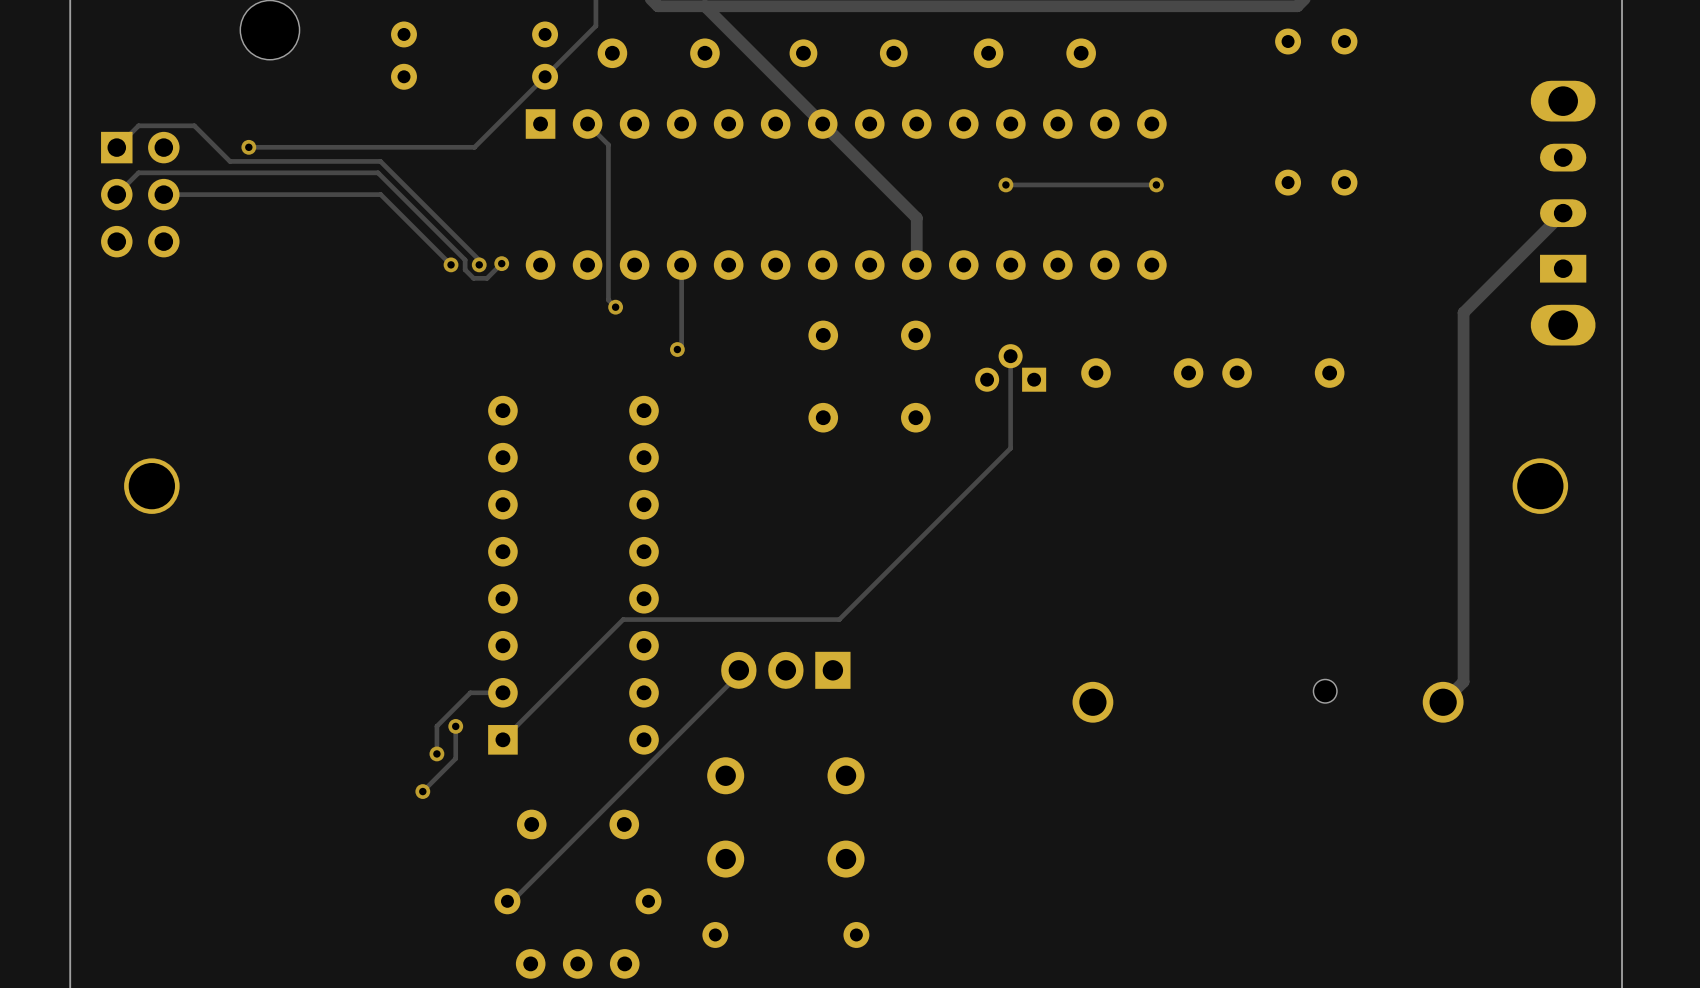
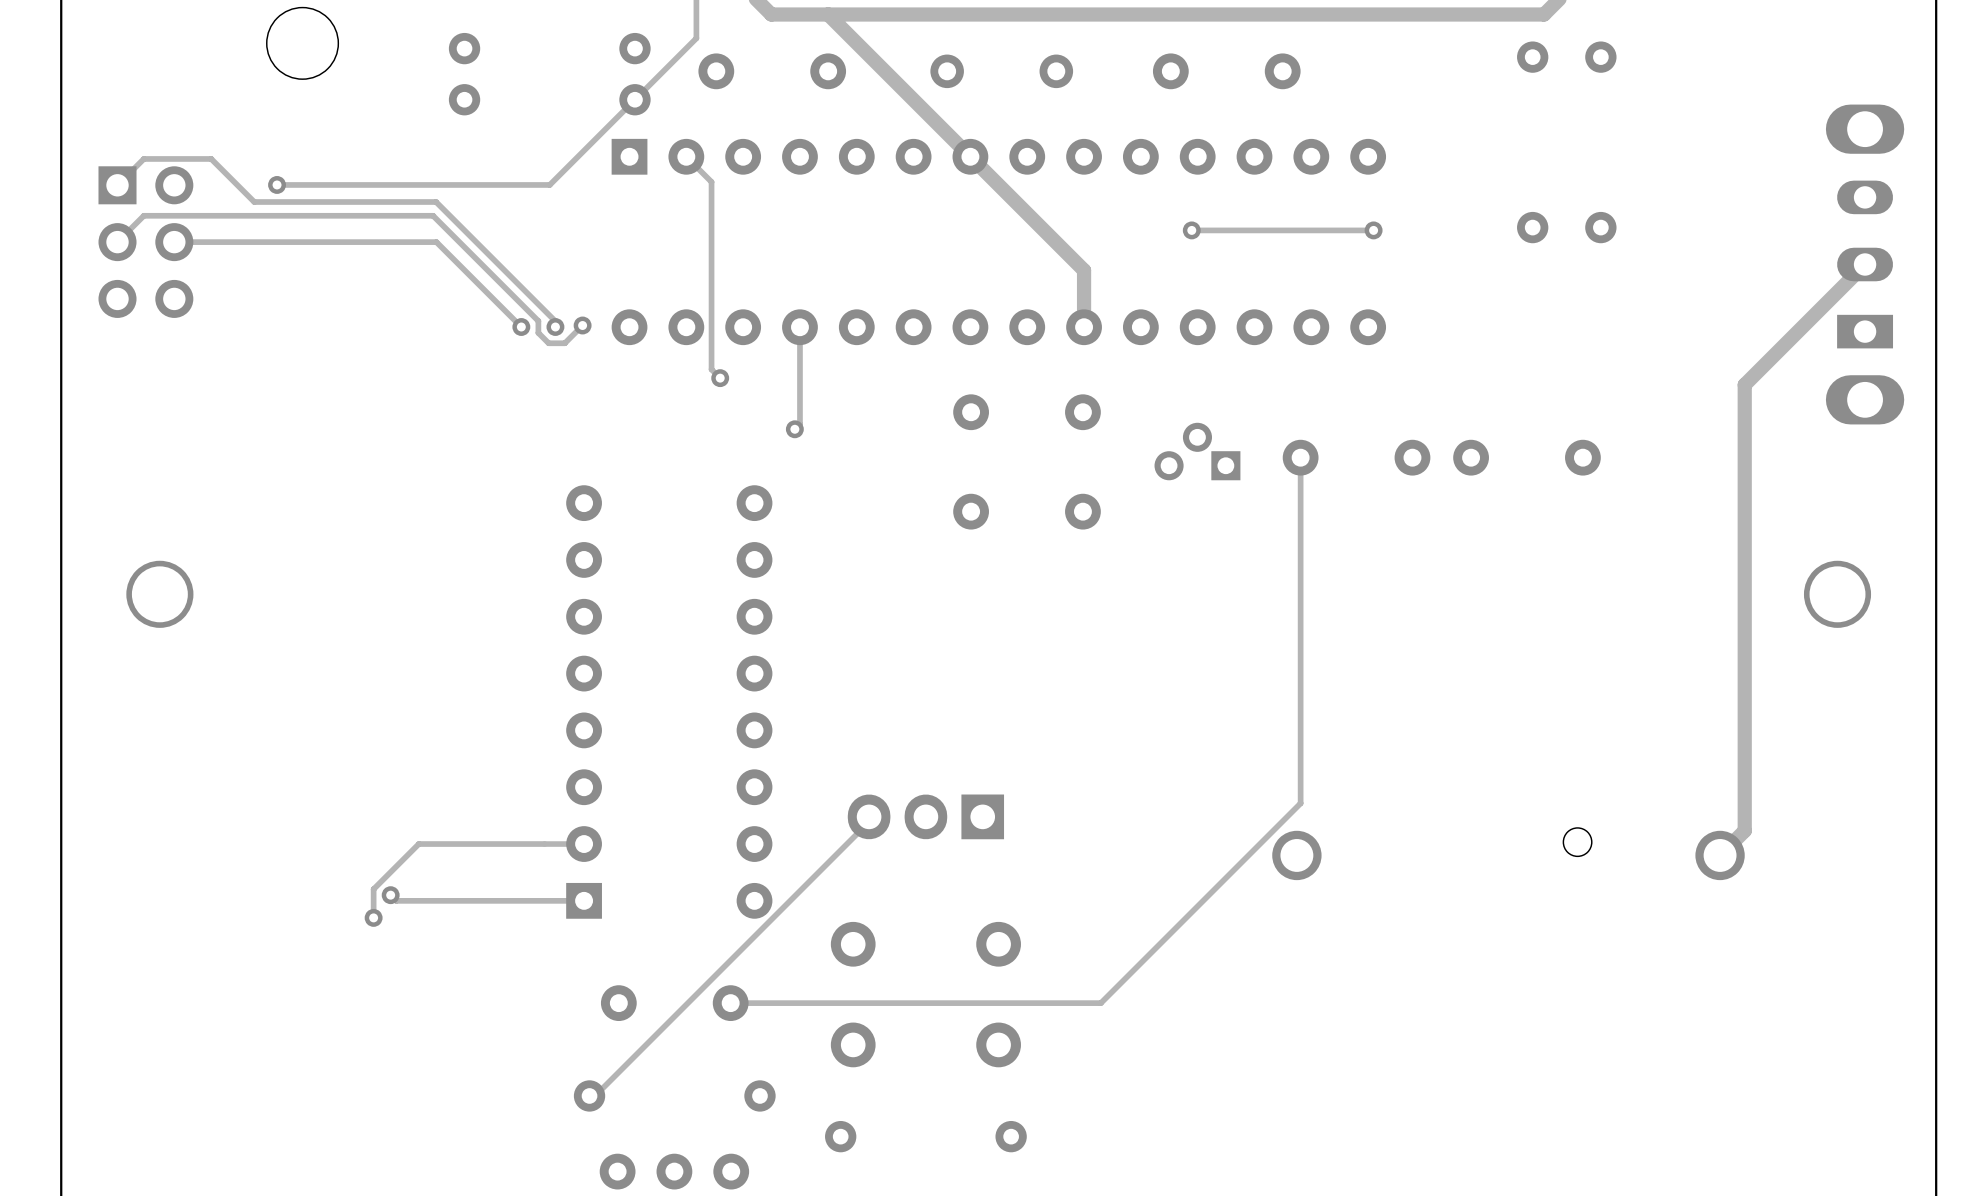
track: (1010, 356) (1010, 448) (839, 619) (623, 619) (502, 739) -> (390, 895) (396, 900) (584, 900)
track: none -> (1300, 457) (1300, 803) (1100, 1003) (730, 1003)
track: (470, 692) (436, 726) (436, 753) -> (544, 844) (418, 844) (373, 889) (373, 917)
track: (455, 726) (455, 758) (422, 791) -> none
via: (455, 726) -> none
via: none -> (390, 895)
via: none -> (373, 917)
via: (436, 753) -> none
via: (422, 791) -> none

